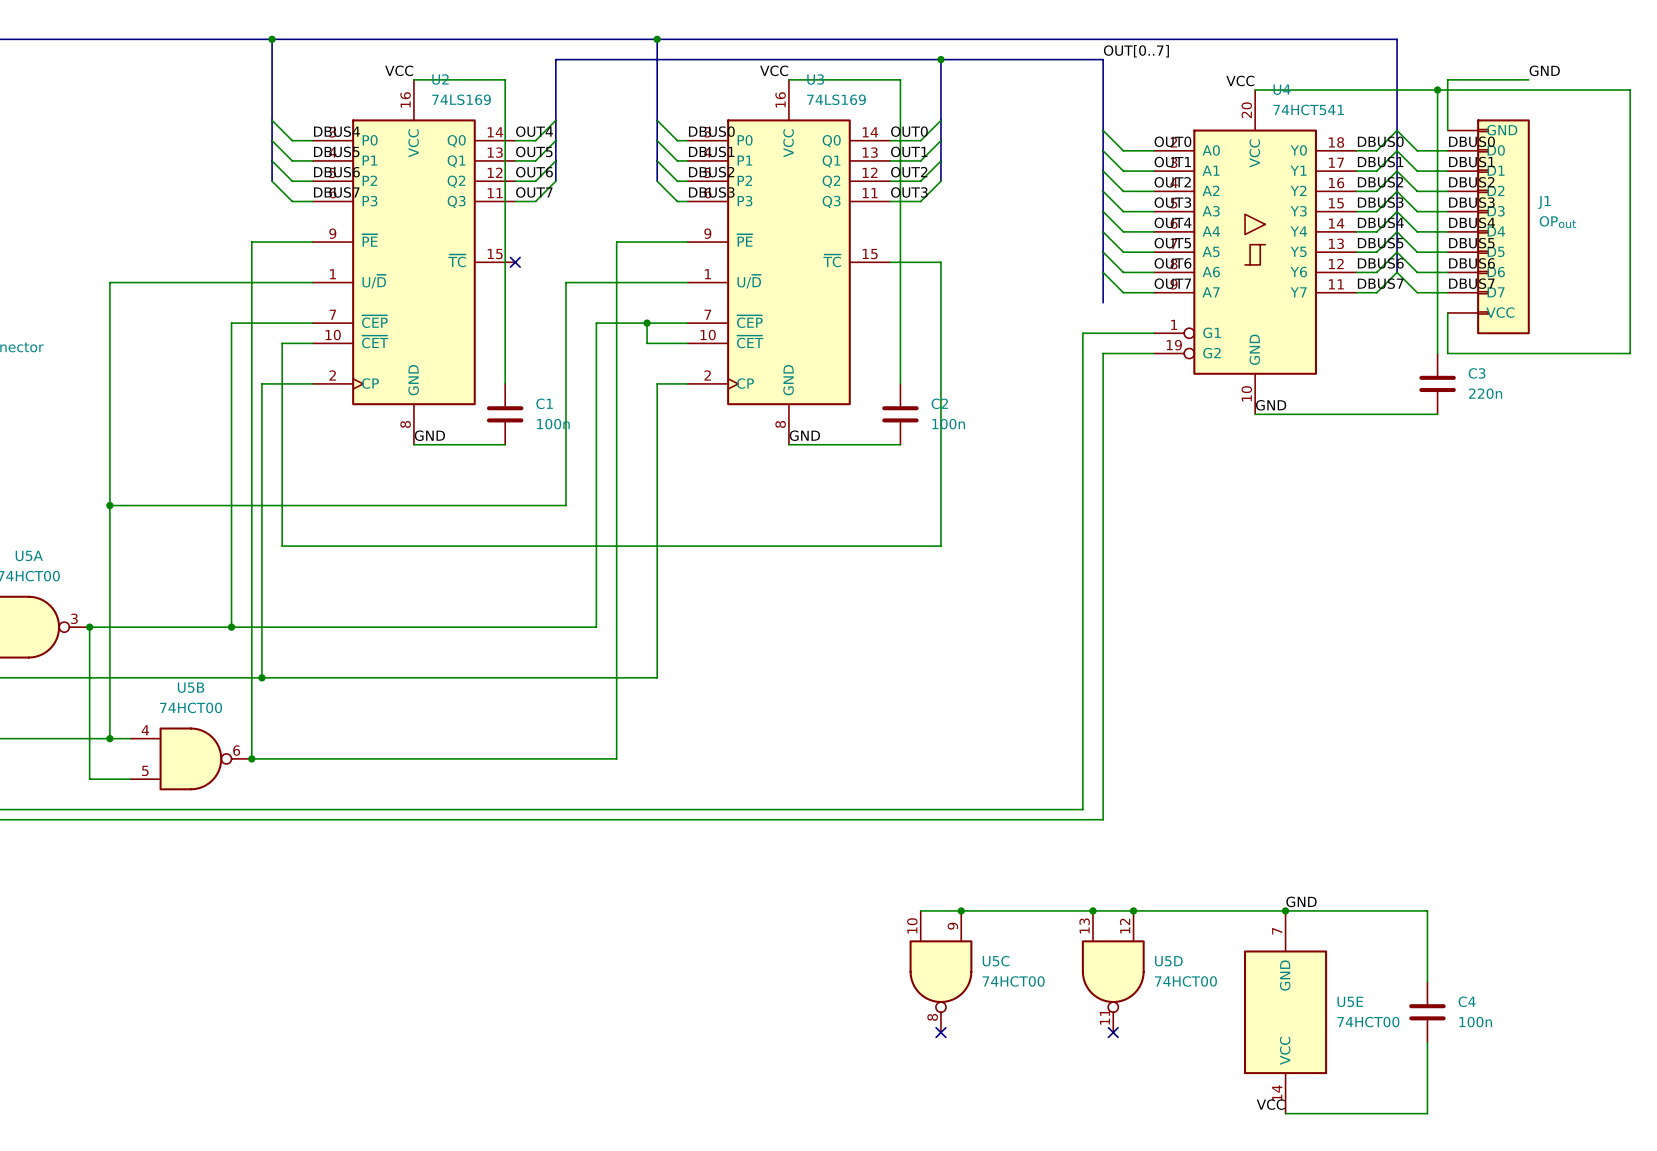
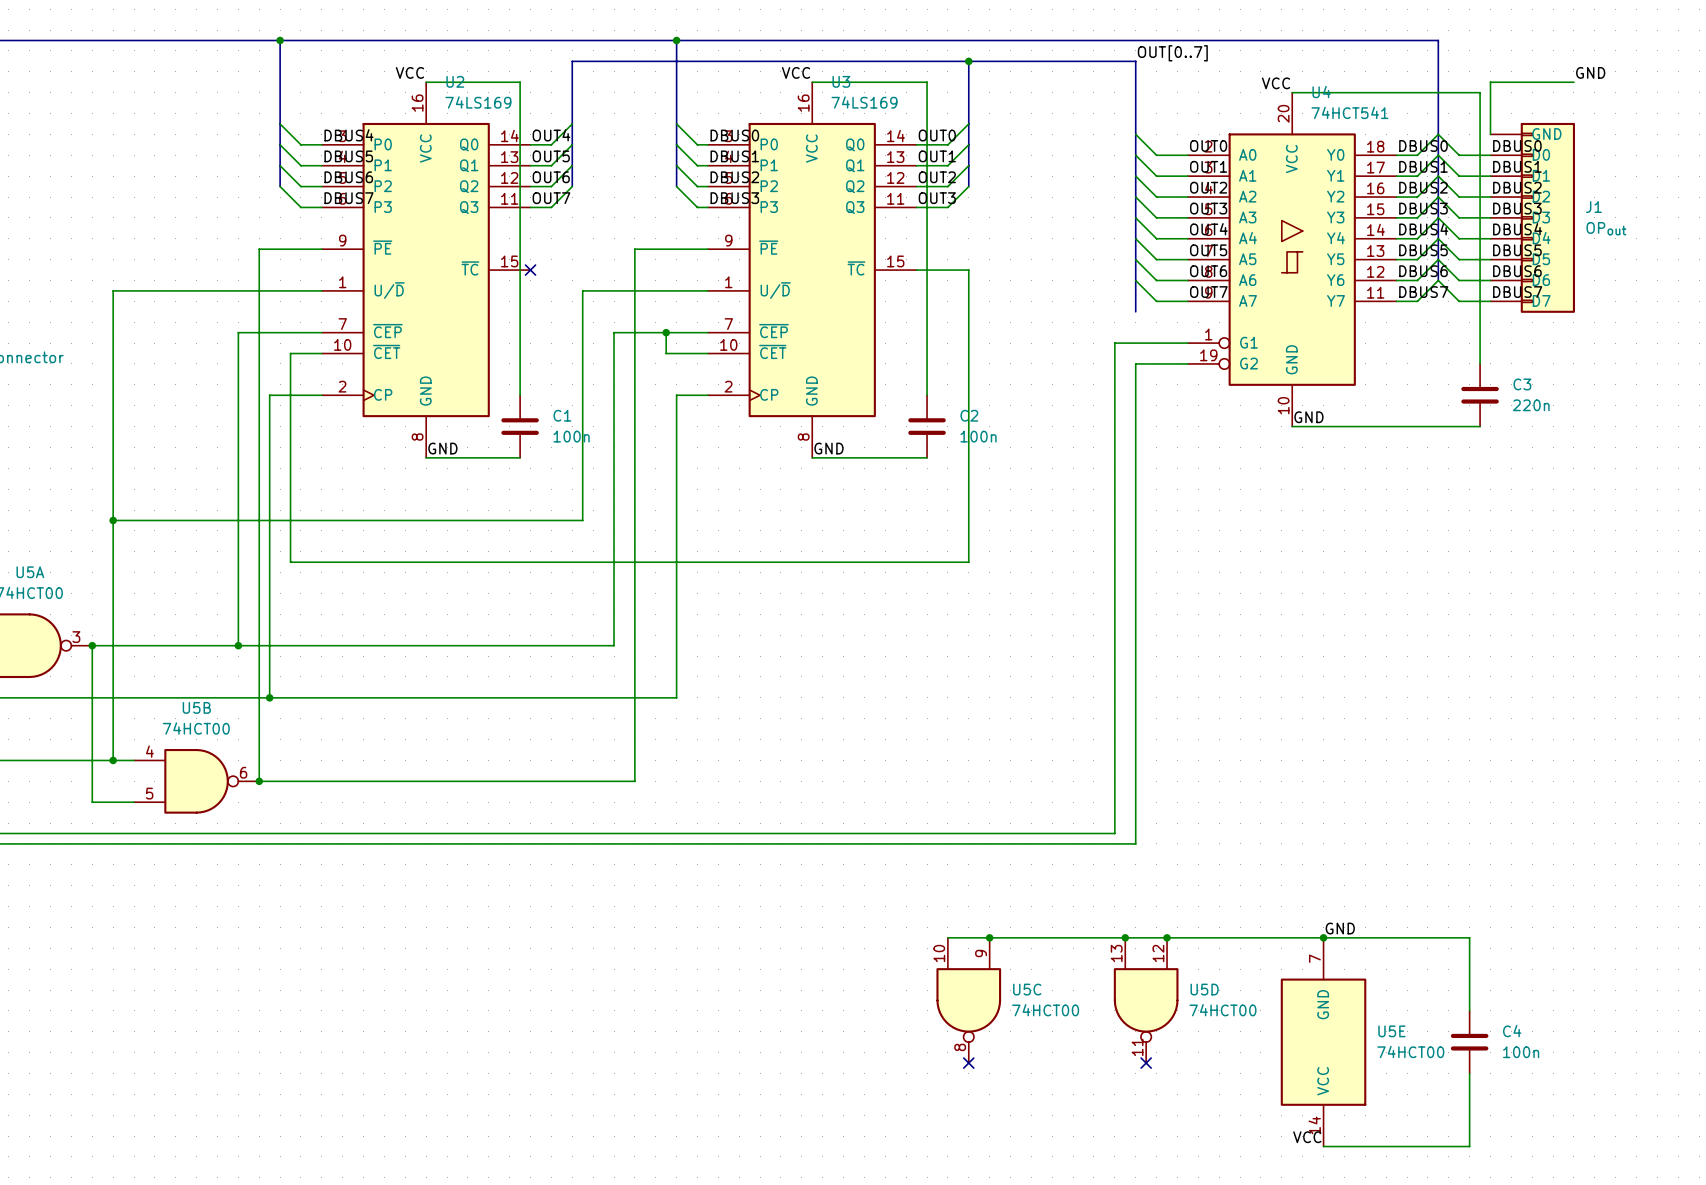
wire: (1437, 90) (1630, 90) (1630, 353) (1447, 353) (1447, 312) -> none
junction: (1437, 90) -> none
J1 symbol: [1447, 119, 1530, 335] -> [1490, 122, 1576, 313]

